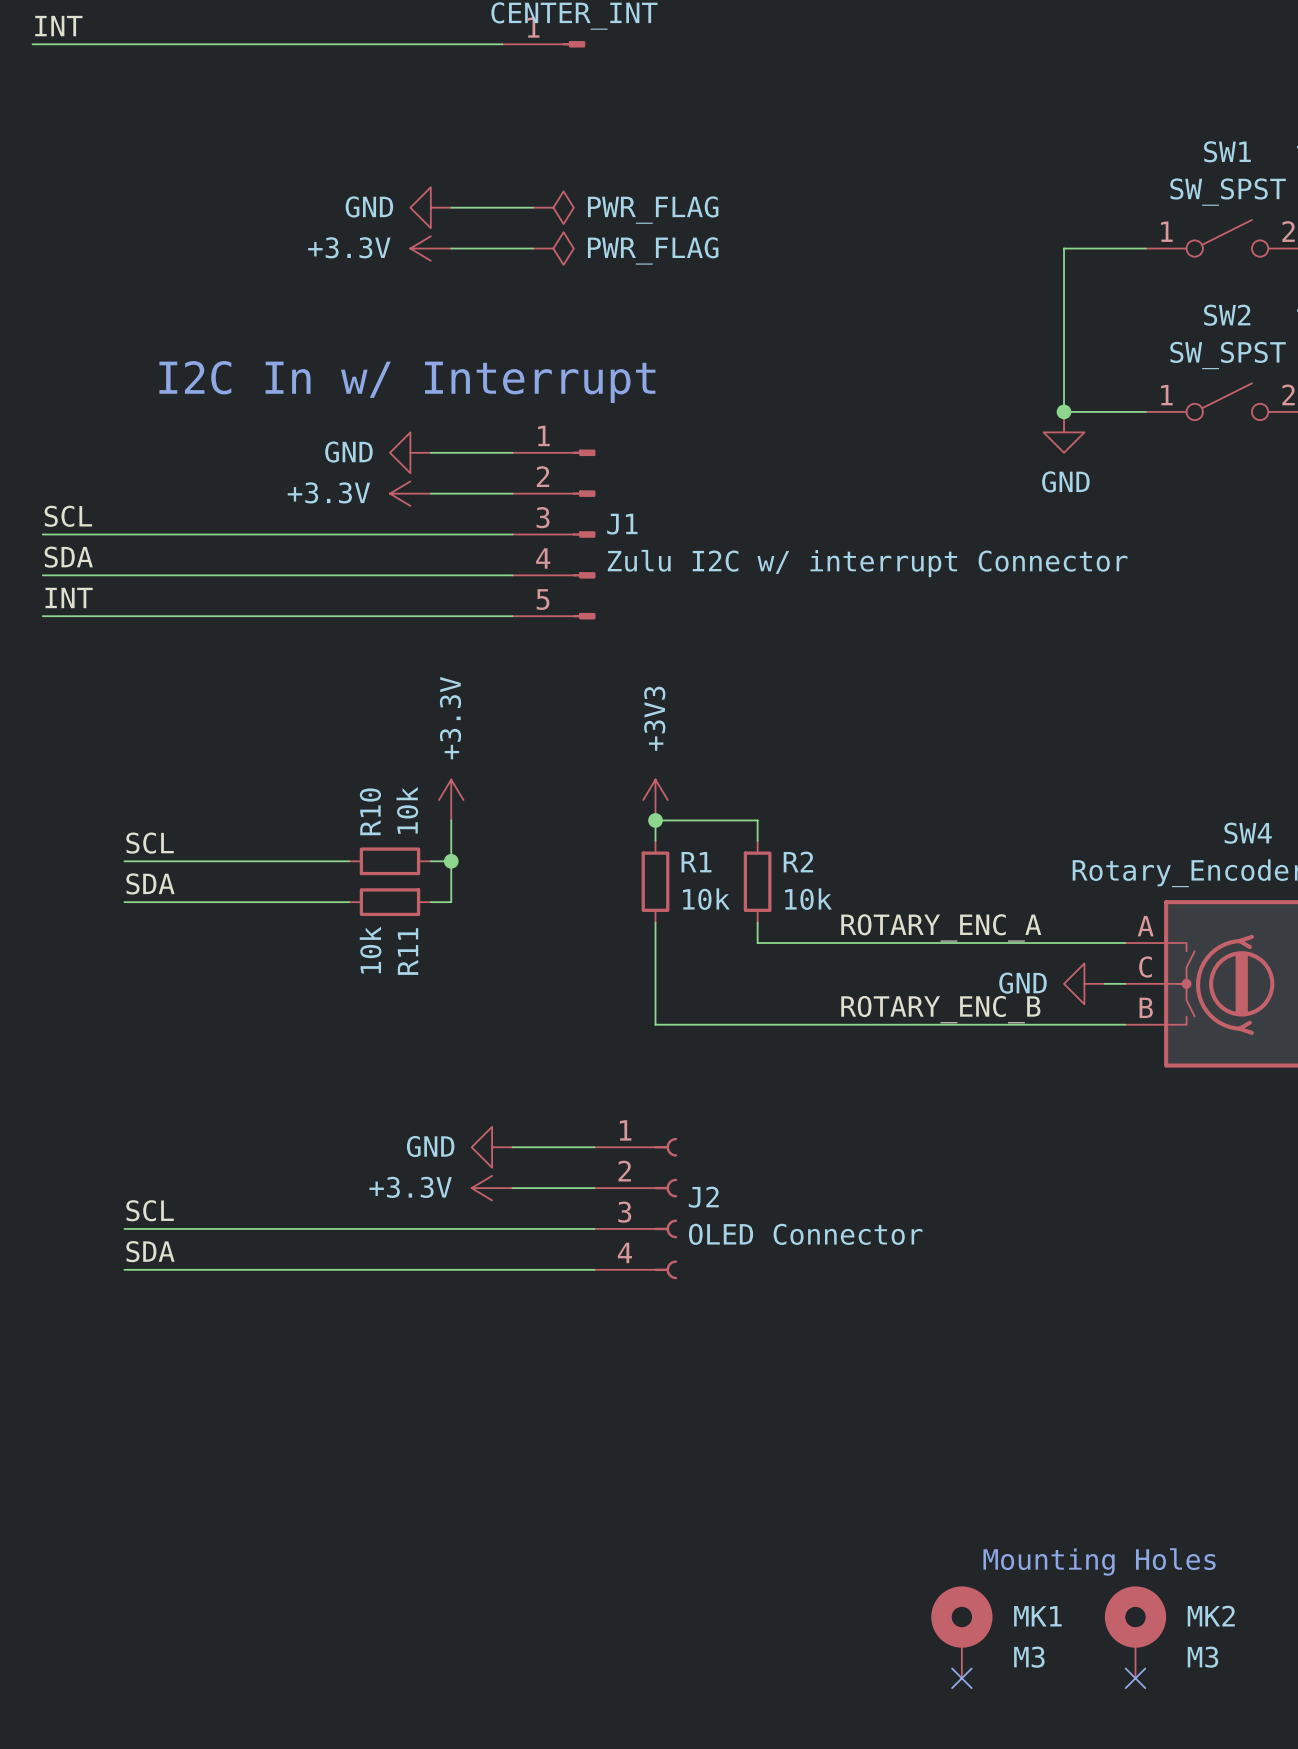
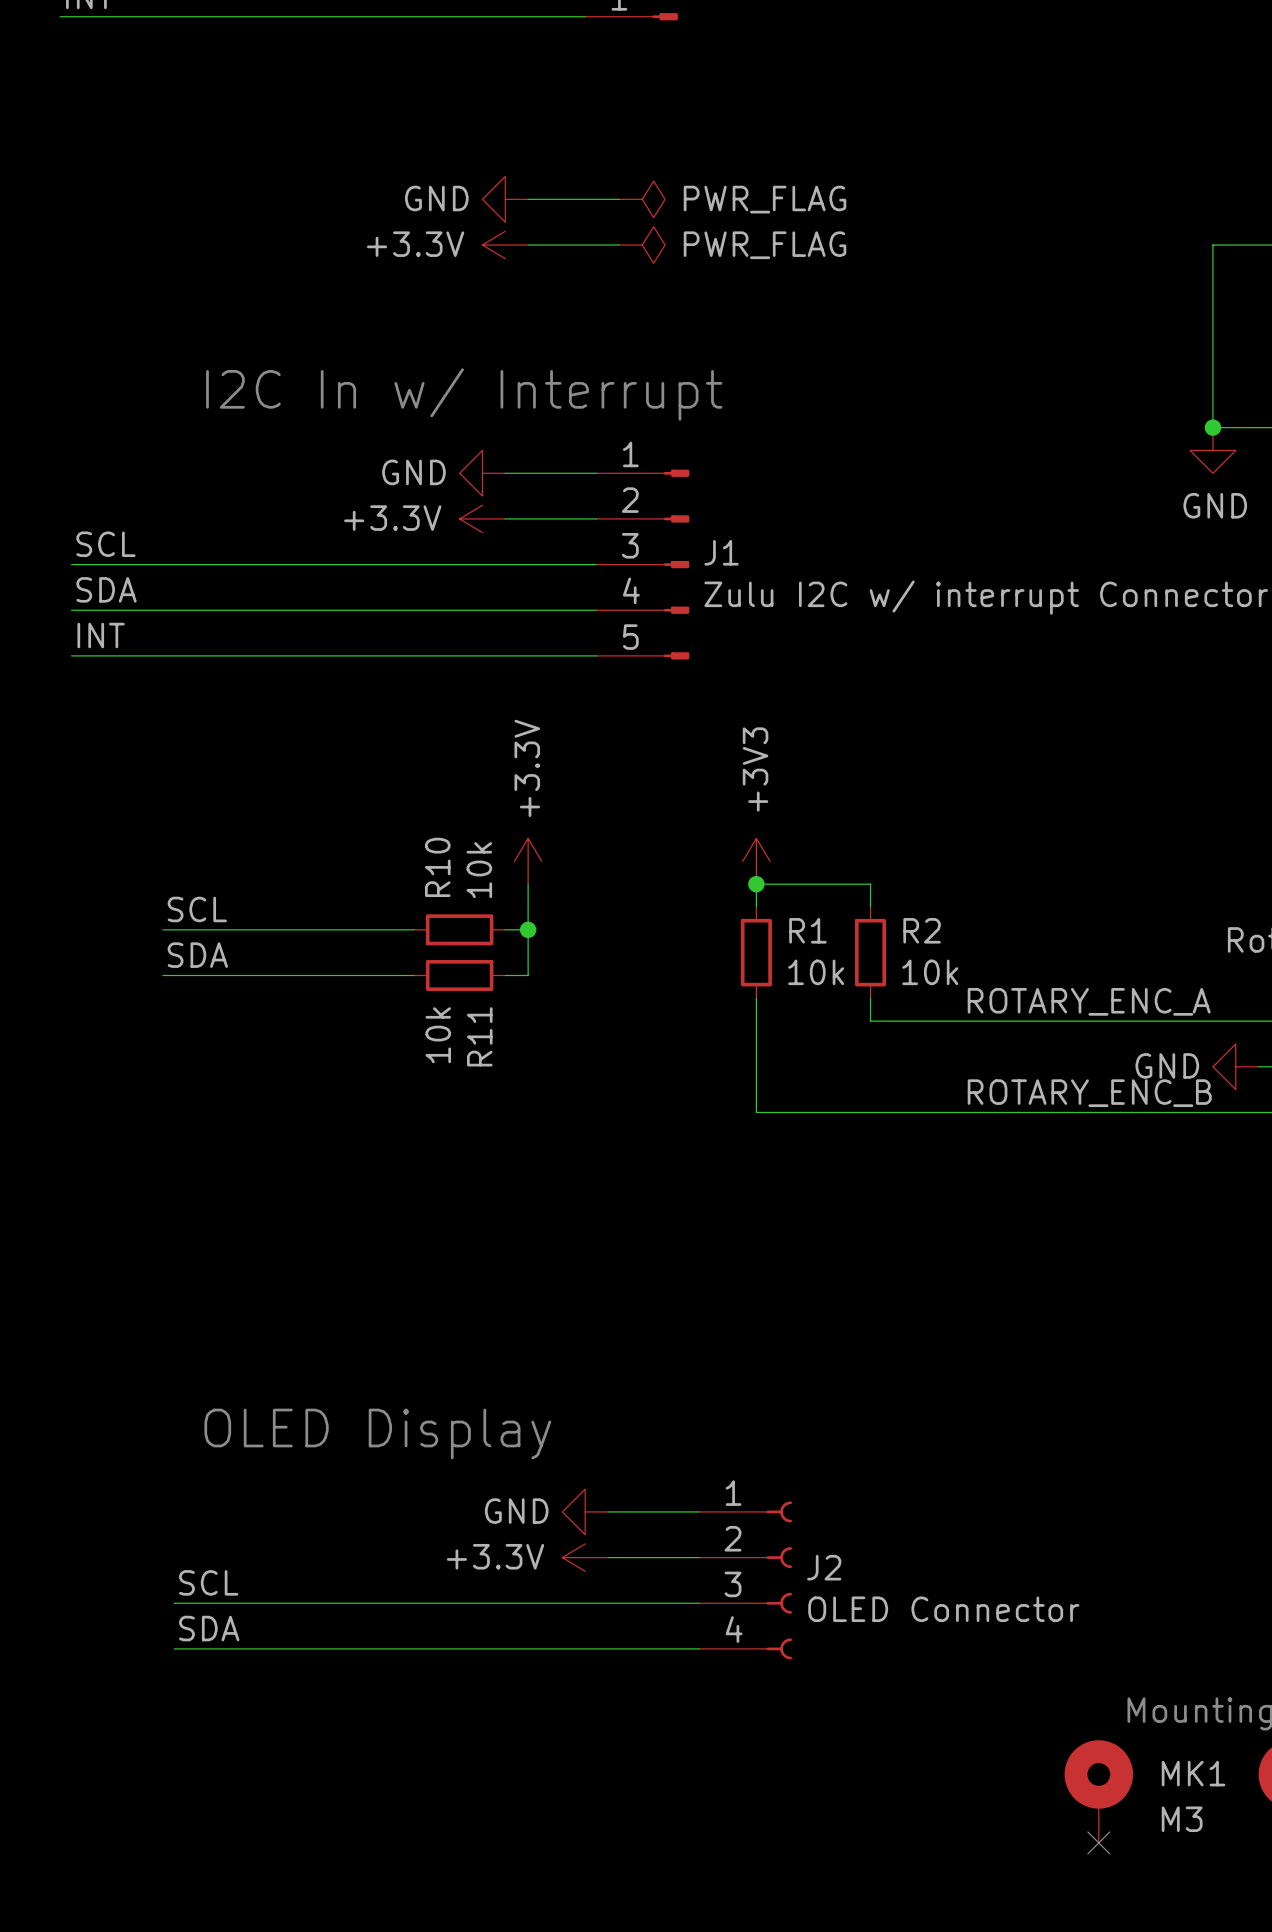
power symbol position: GND (492, 1147) -> GND (585, 1511)
wire: (512, 1147) (594, 1147) -> (608, 1557) (699, 1557)
power symbol position: +3.3V (492, 1188) -> +3.3V (585, 1557)
wire: (512, 1188) (594, 1188) -> (608, 1511) (699, 1511)
J2 position: (635, 1208) -> (745, 1580)
label position: SCL (150, 1210) -> SCL (208, 1582)
wire: (124, 1228) (594, 1228) -> (174, 1648) (699, 1648)
label position: SDA (150, 1251) -> SDA (209, 1628)
wire: (124, 1269) (594, 1269) -> (174, 1603) (699, 1603)
text: none -> OLED Display (377, 1433)

